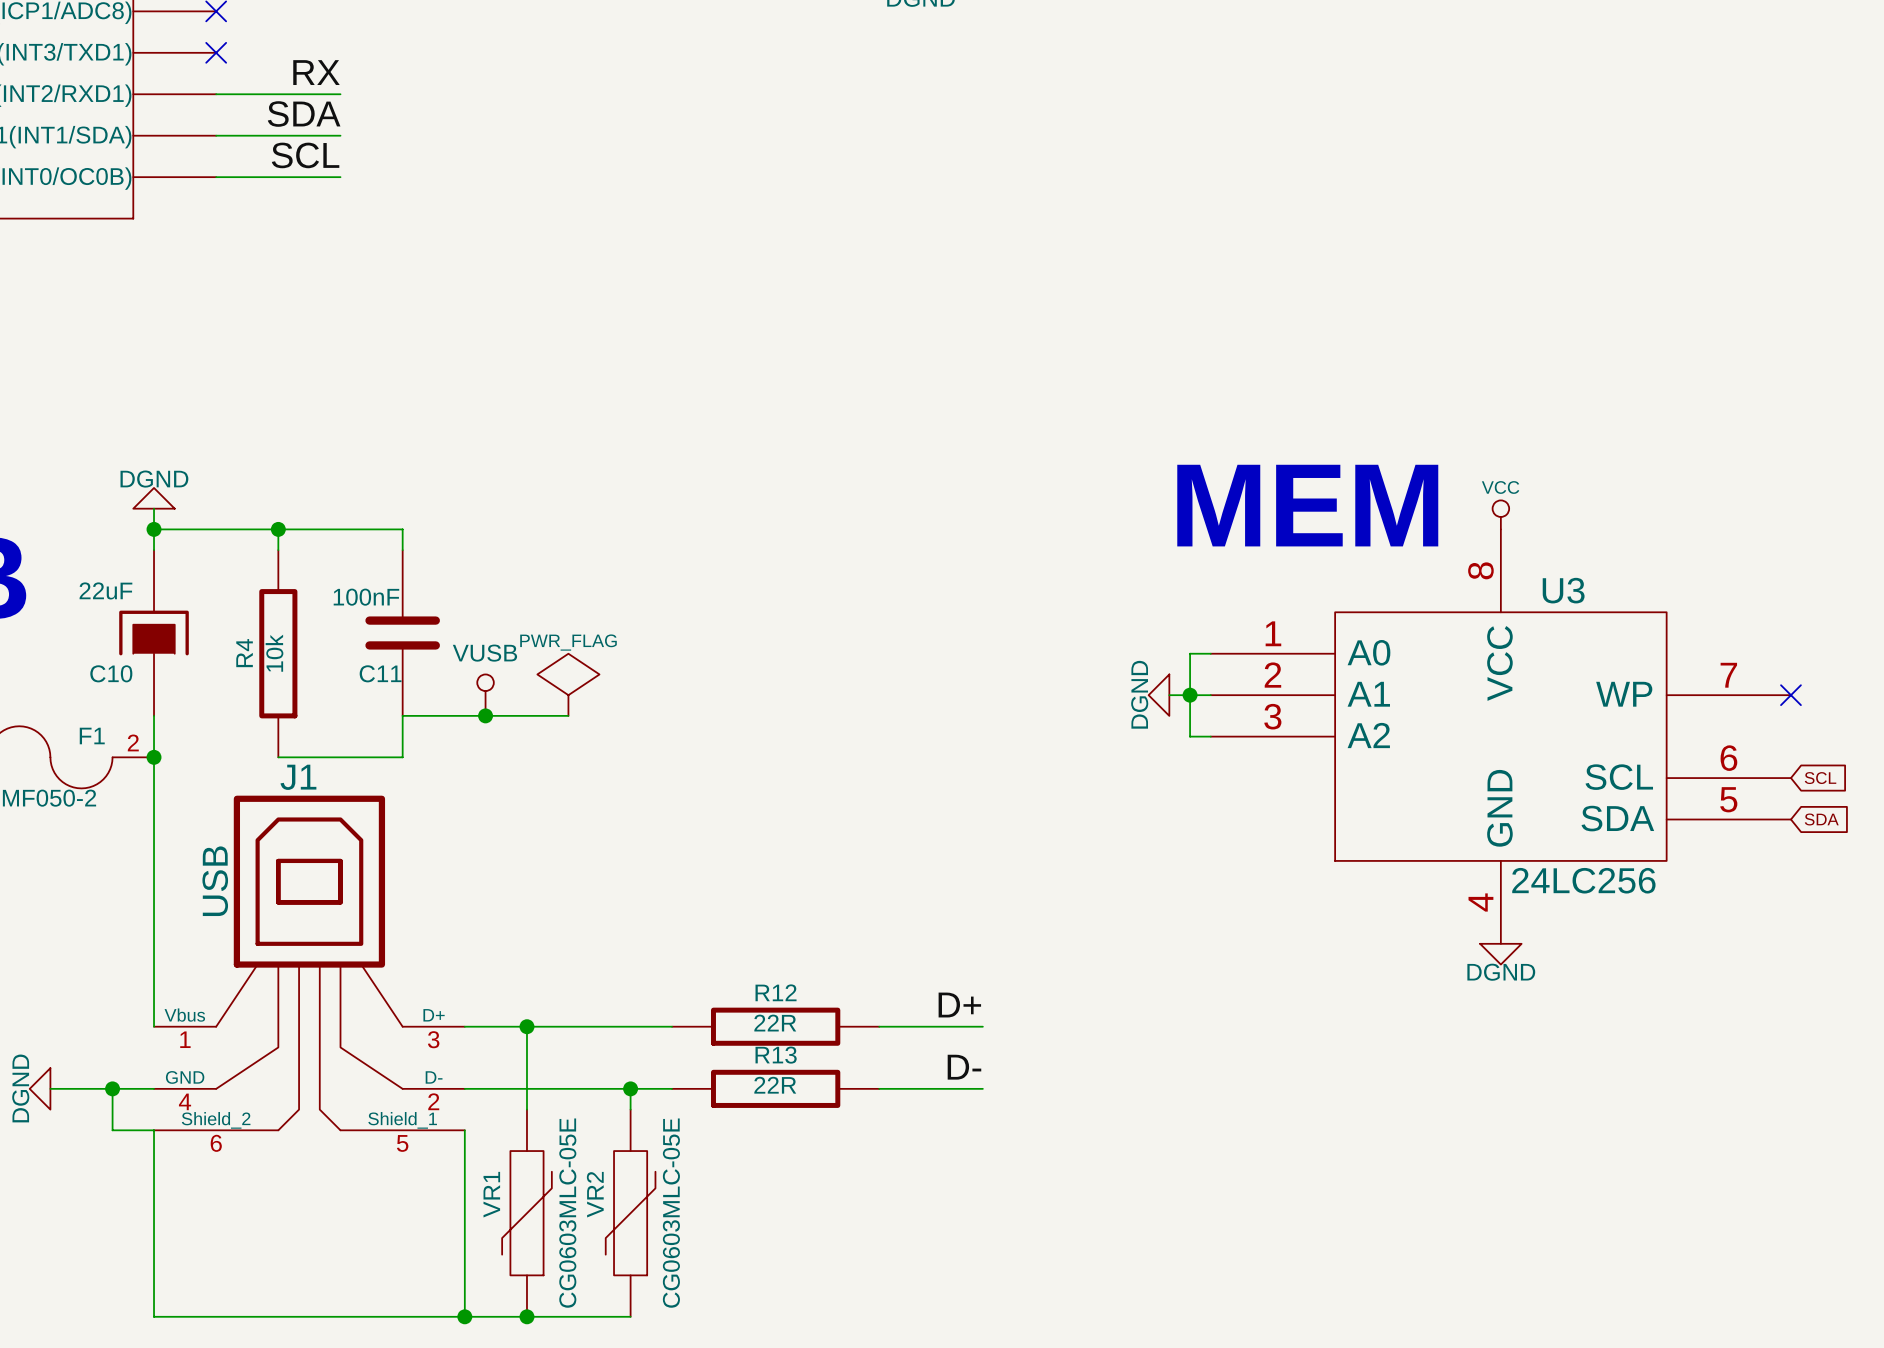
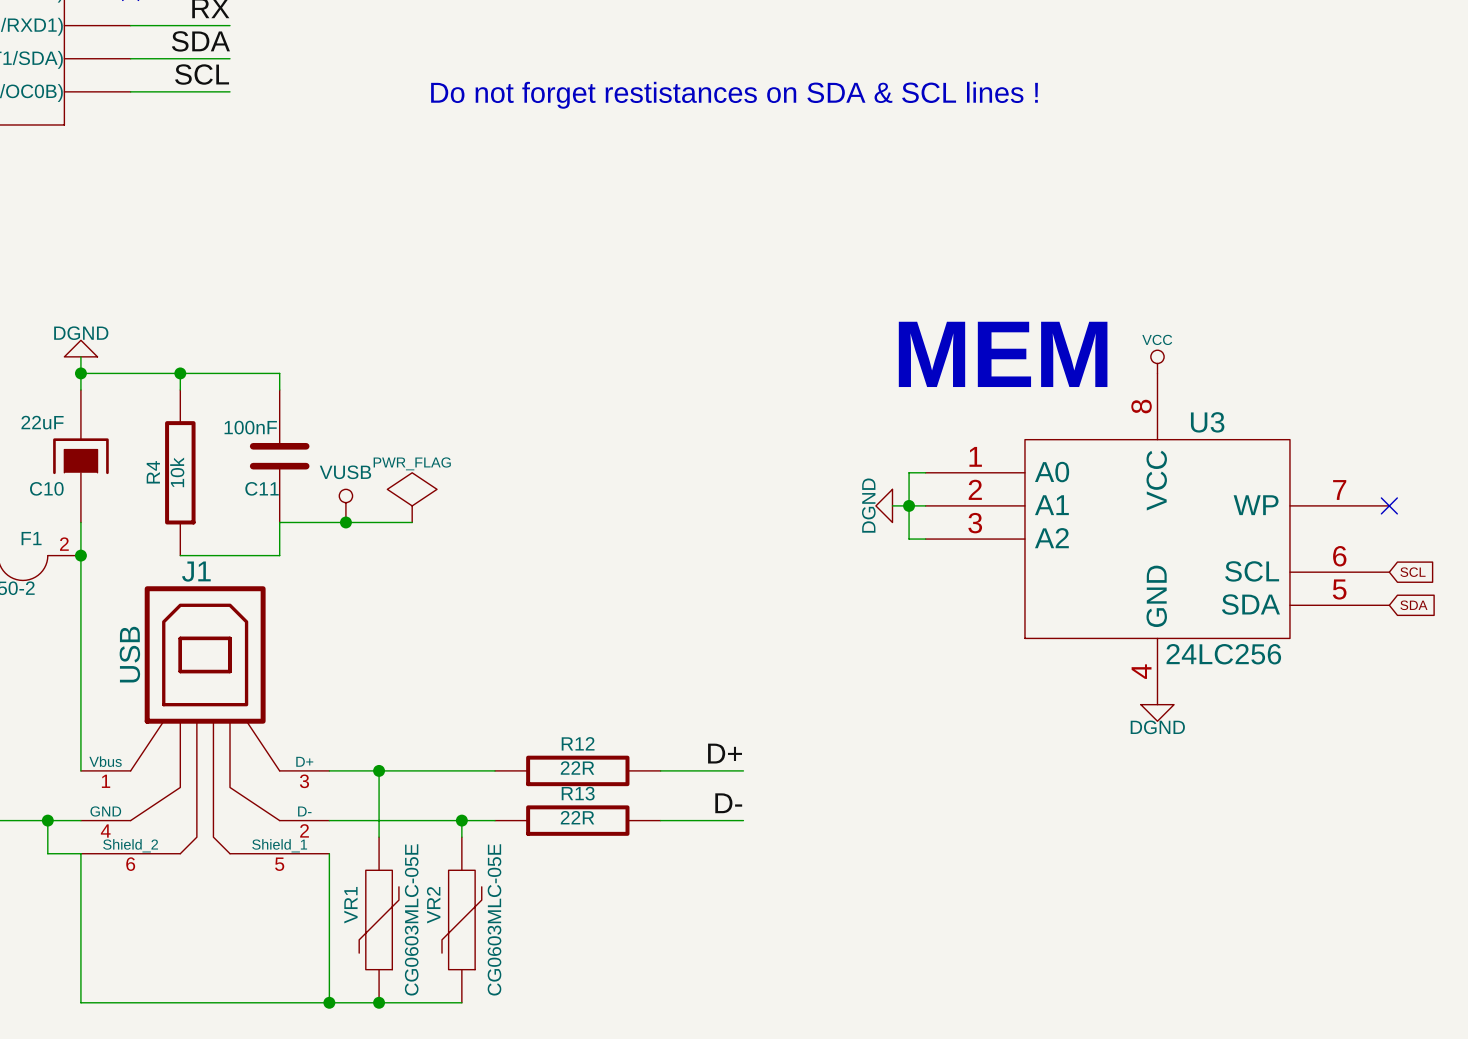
text: none -> Do not forget restistances on SDA & SCL lines ! (734, 95)

